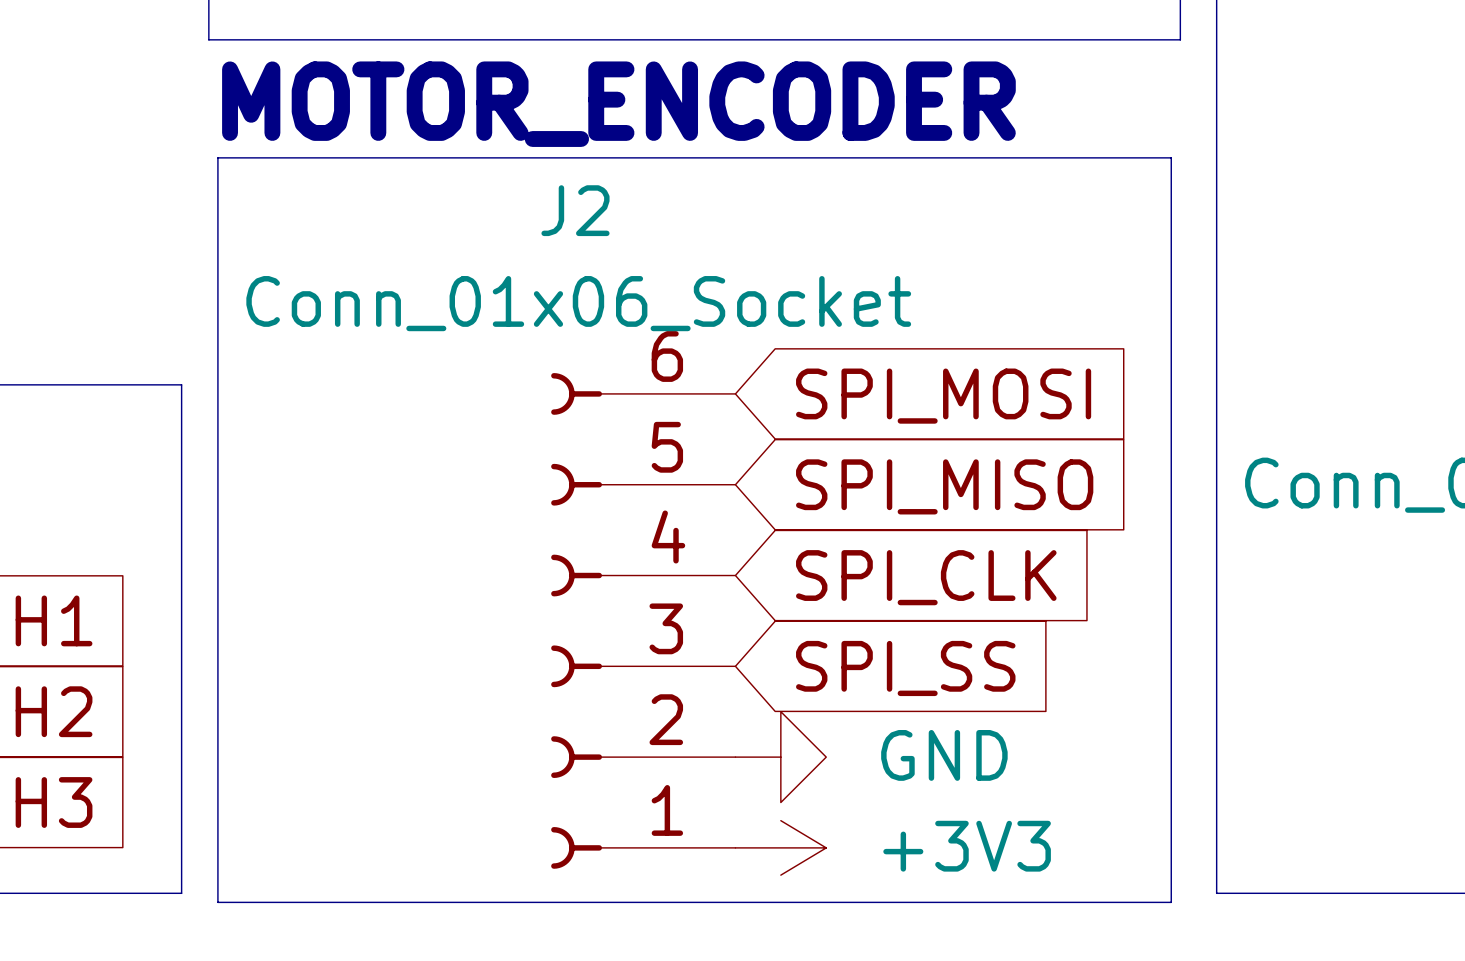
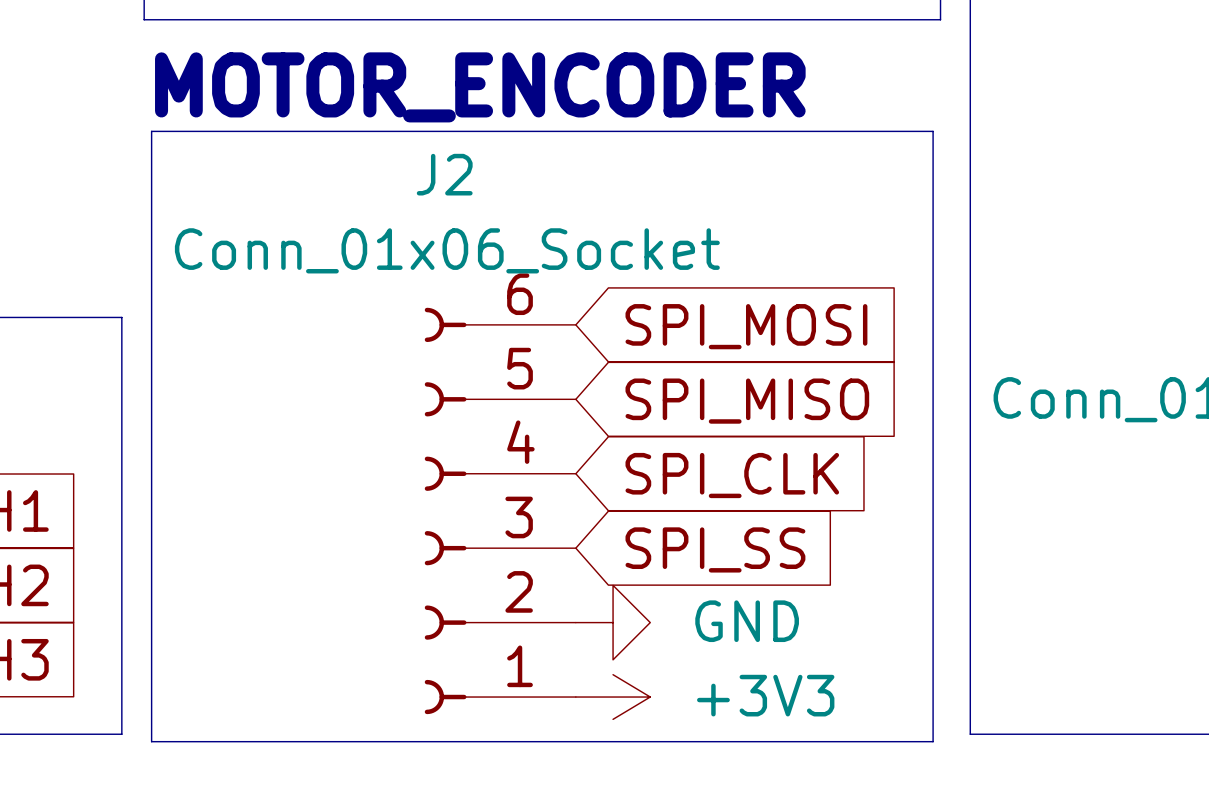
line: (208, 21) (208, 39) (1180, 39) (1180, 21) -> (144, 19) (940, 19)

